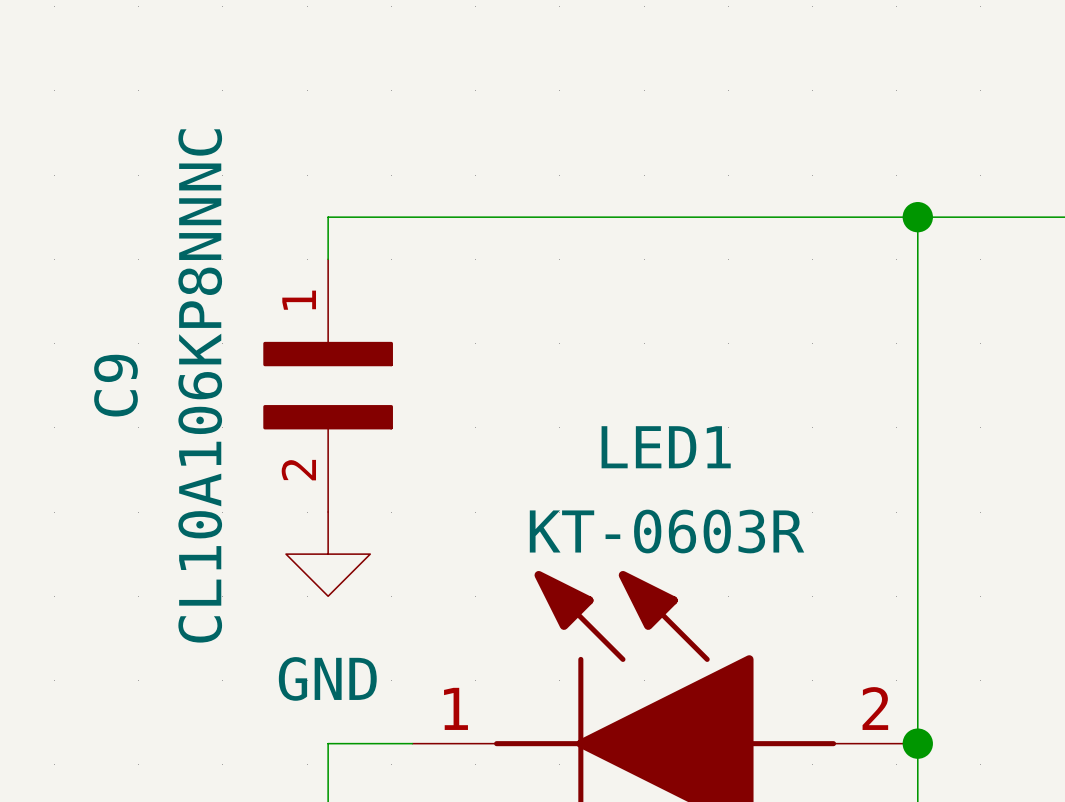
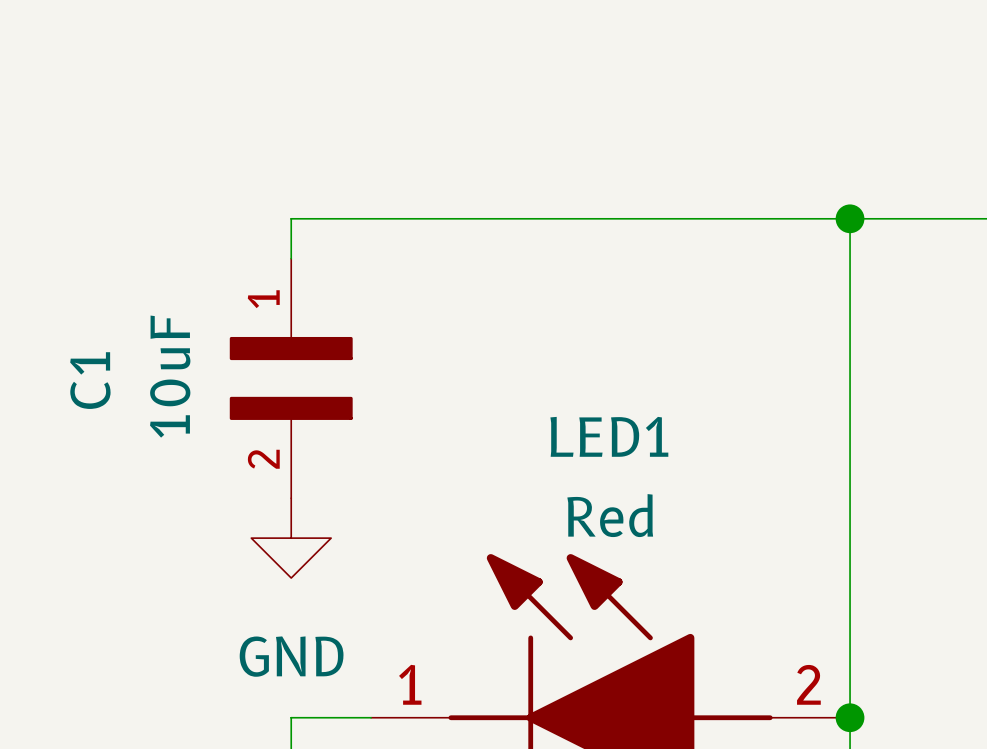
C9 name: C9 (116, 385) -> C1 (90, 380)
C9 value: CL10A106KP8NNNC (200, 385) -> 10uF (170, 376)
LED1 value: KT-0603R (667, 531) -> Red (610, 515)

